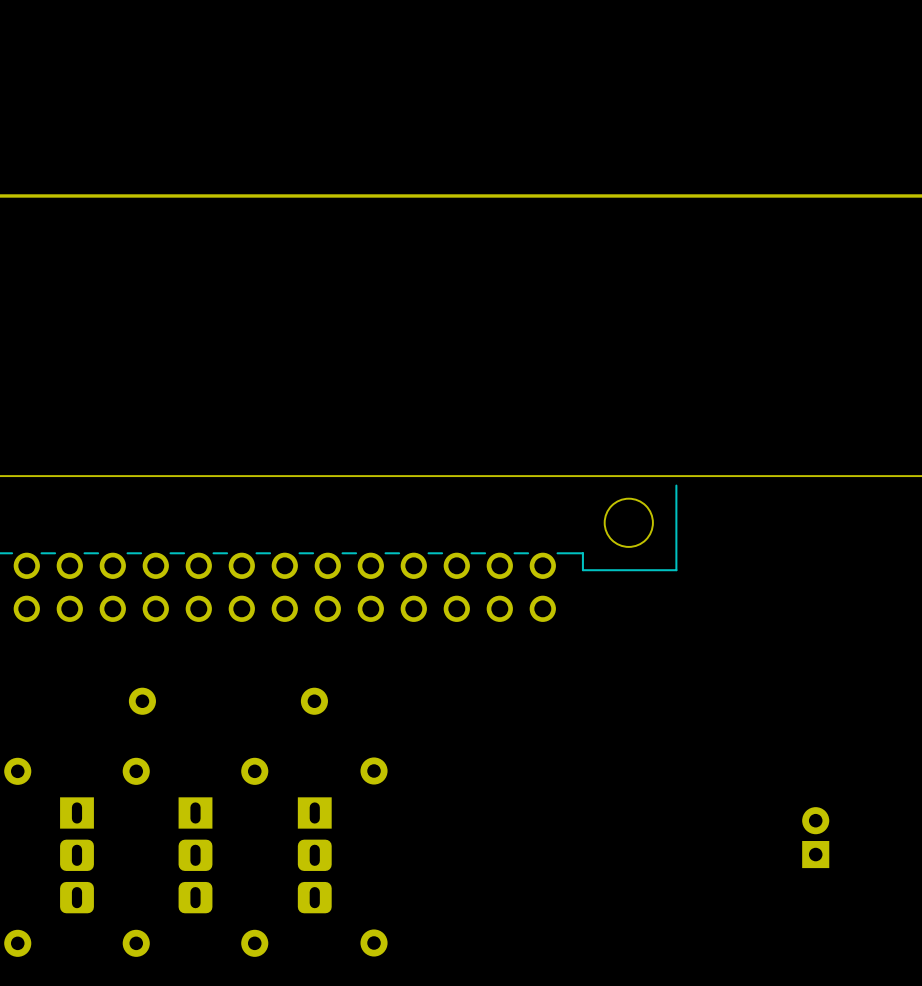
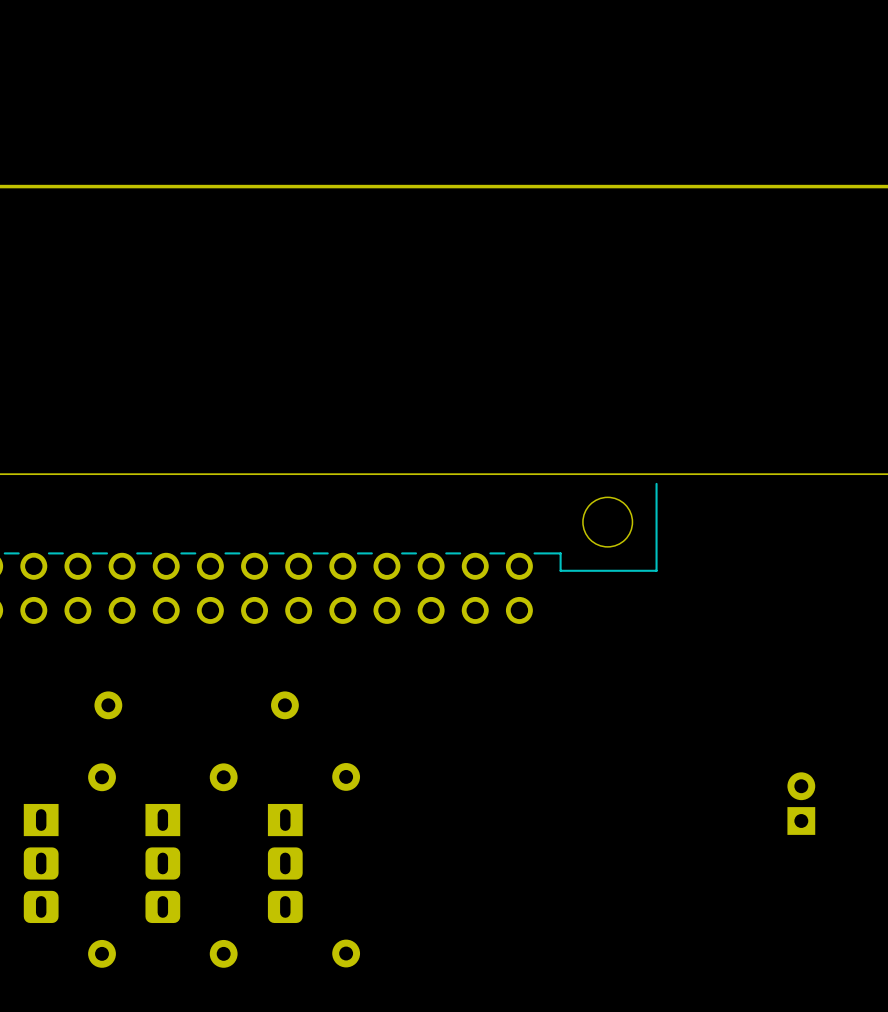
part position: (815, 837) -> (801, 803)

